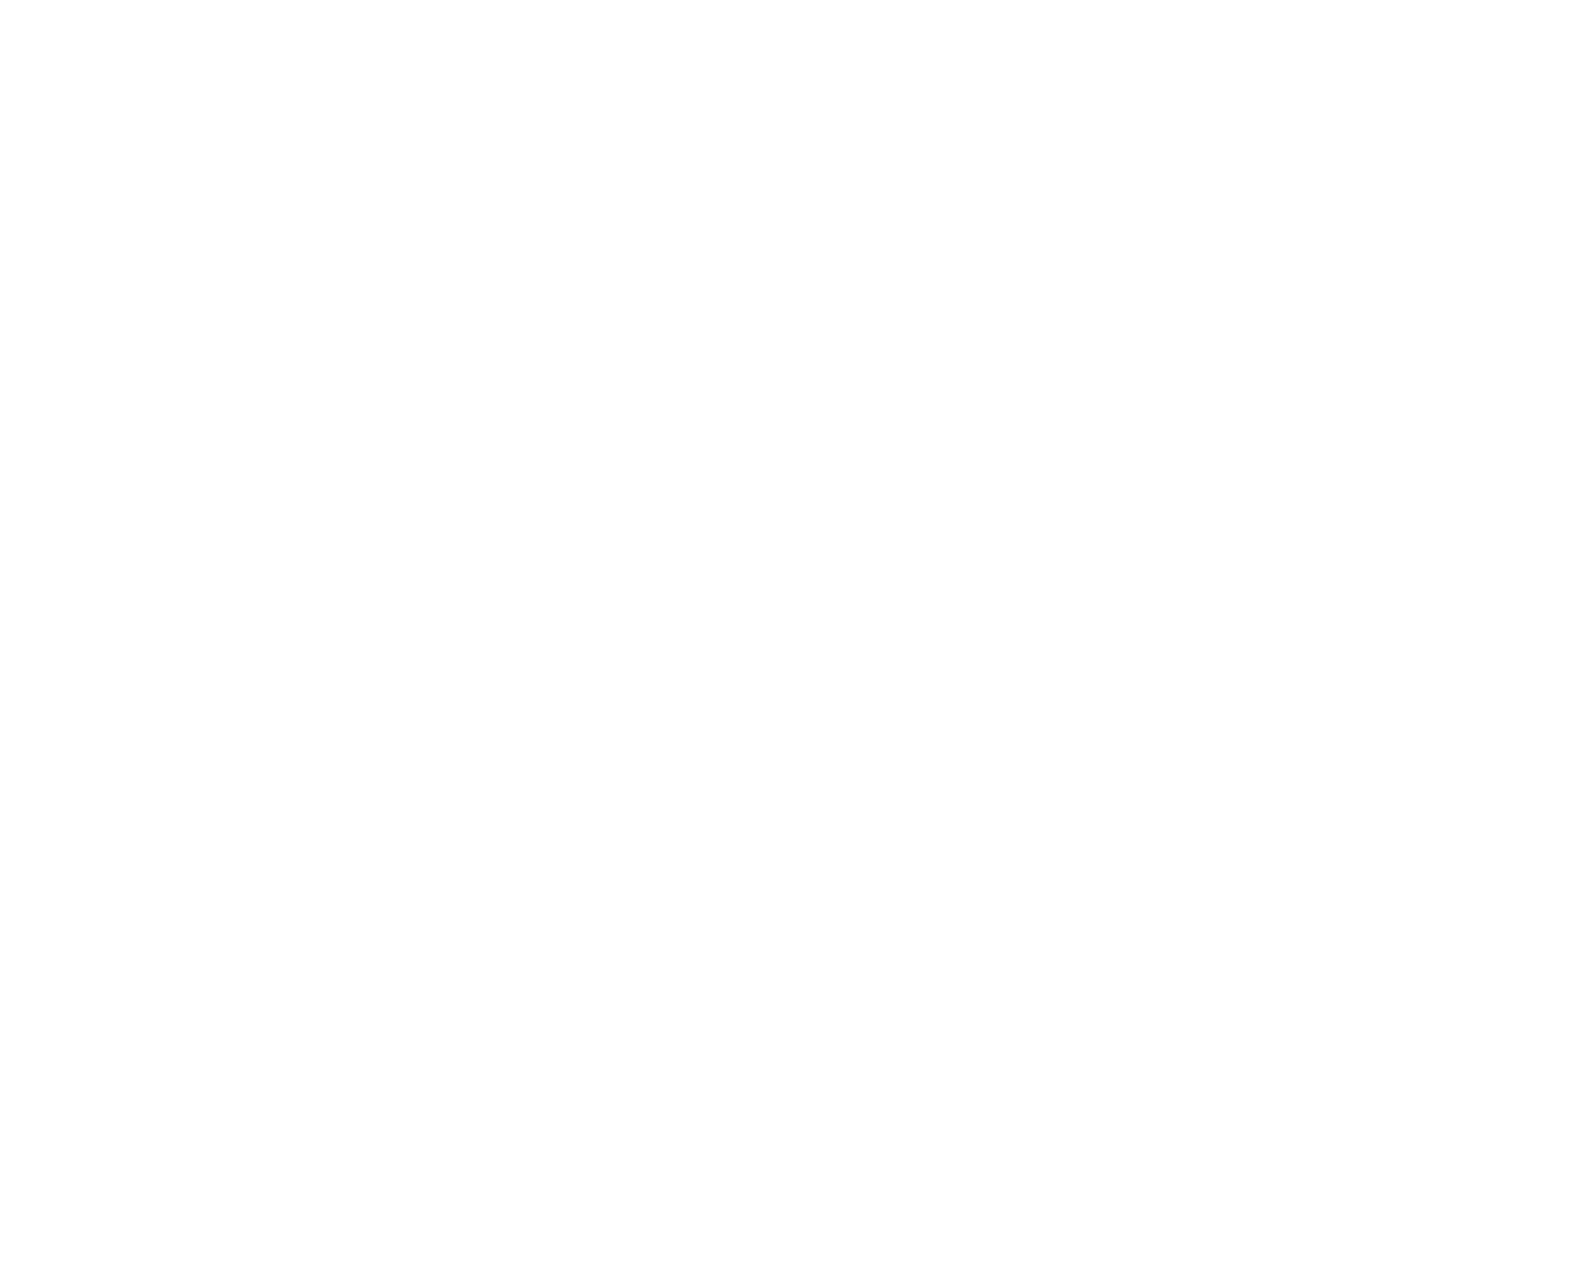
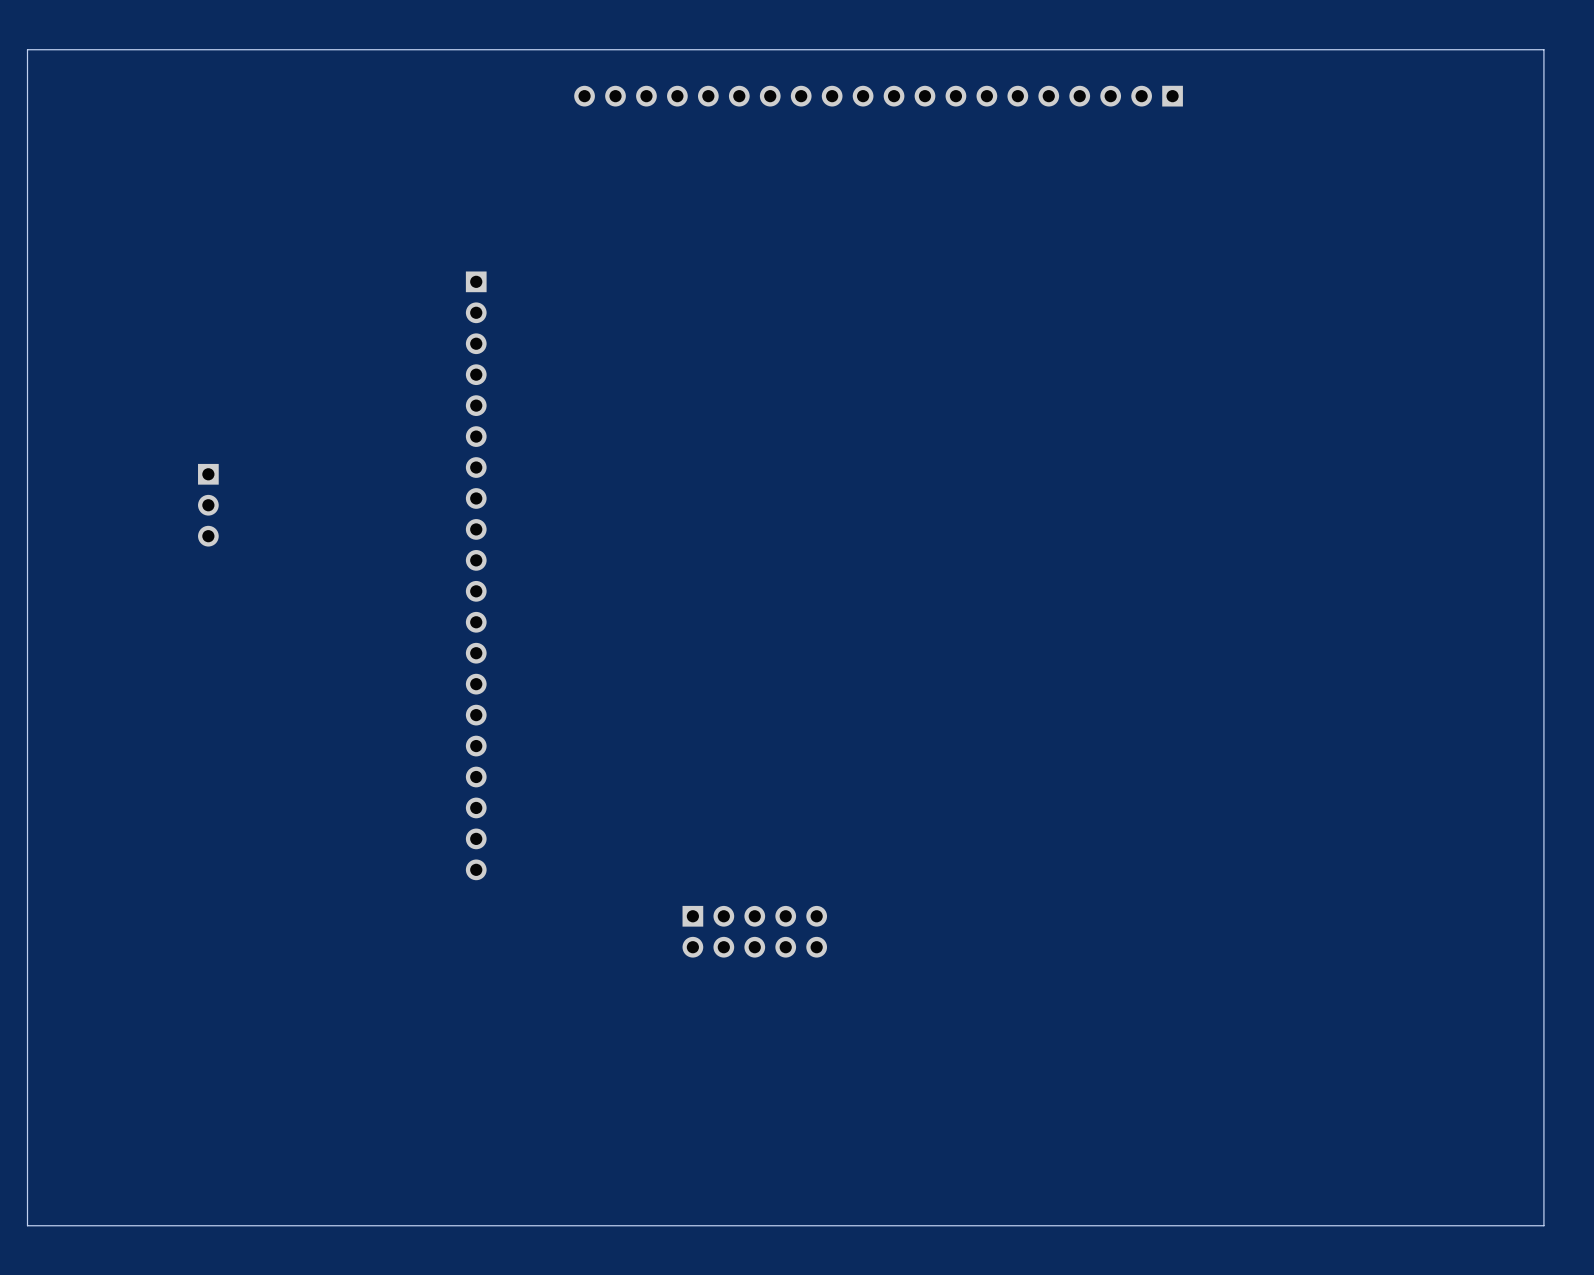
board edge: none -> (1543, 49) (27, 49) (27, 1225) (1543, 1225) (1543, 49)
part: none -> (878, 96)
part: none -> (208, 505)
part: none -> (476, 575)
part: none -> (754, 931)

